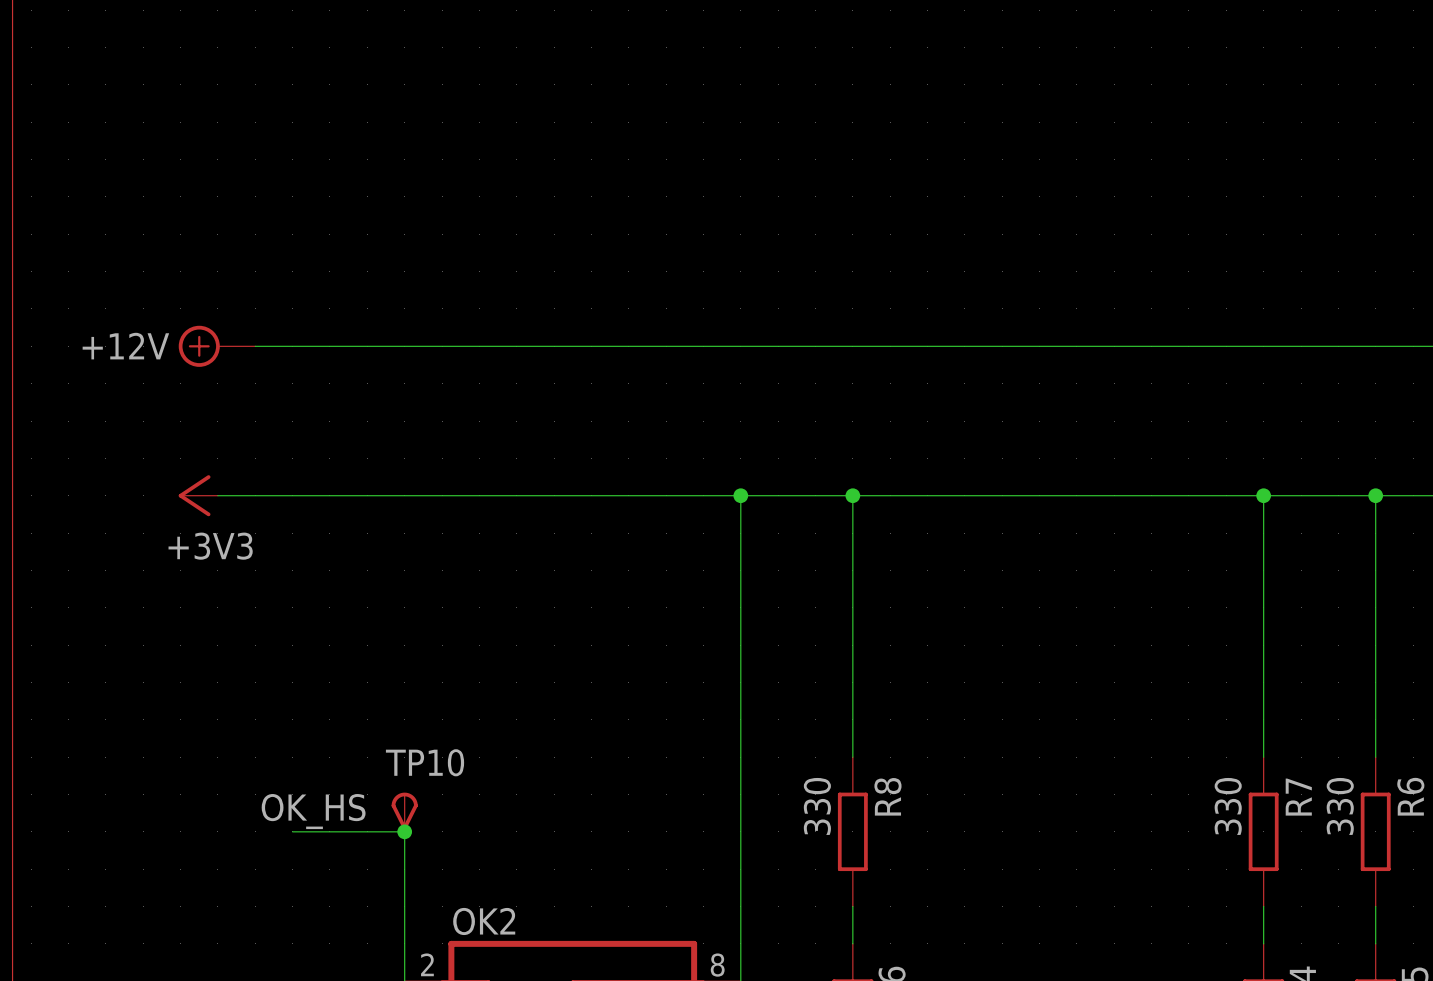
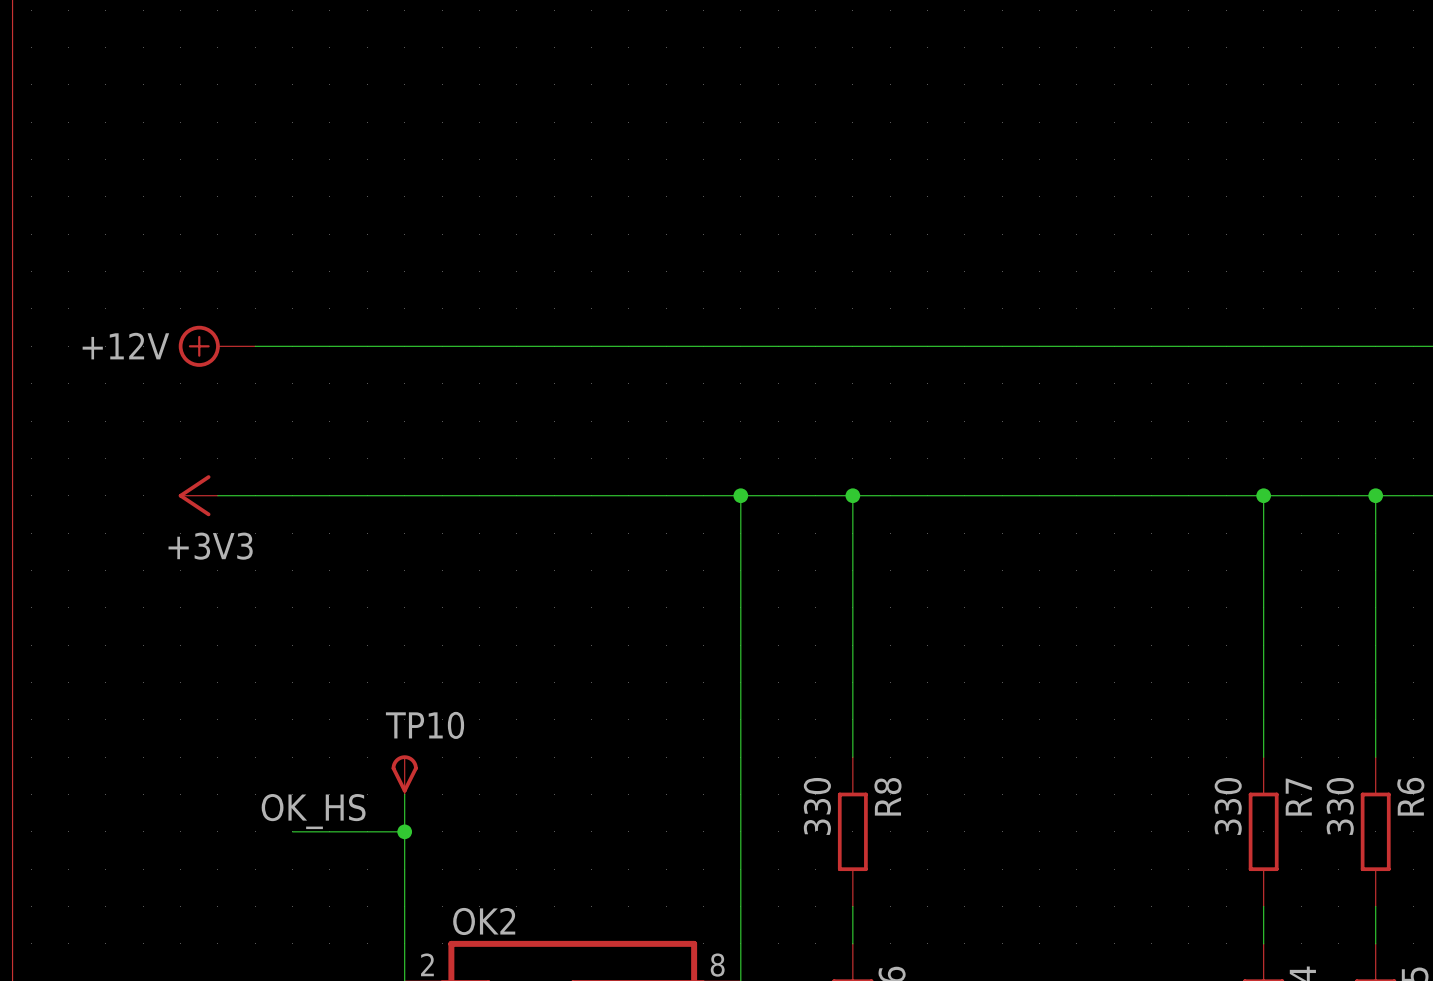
TP10 position: (404, 812) -> (404, 774)

